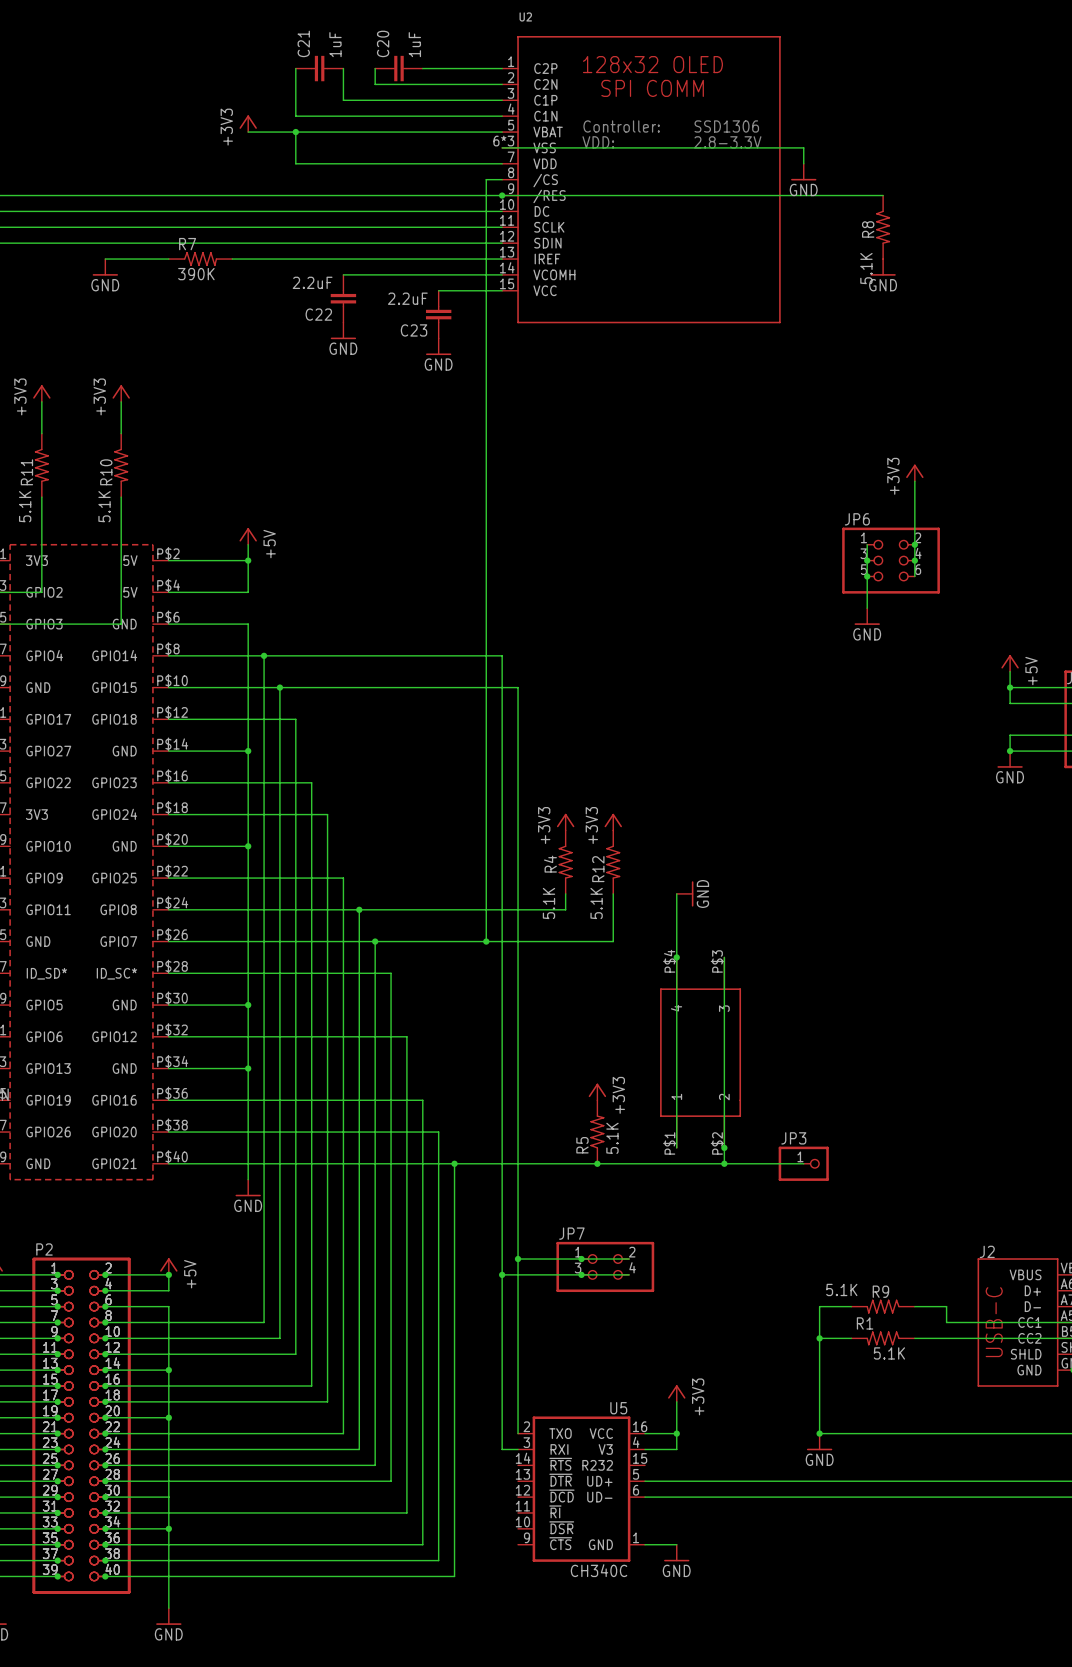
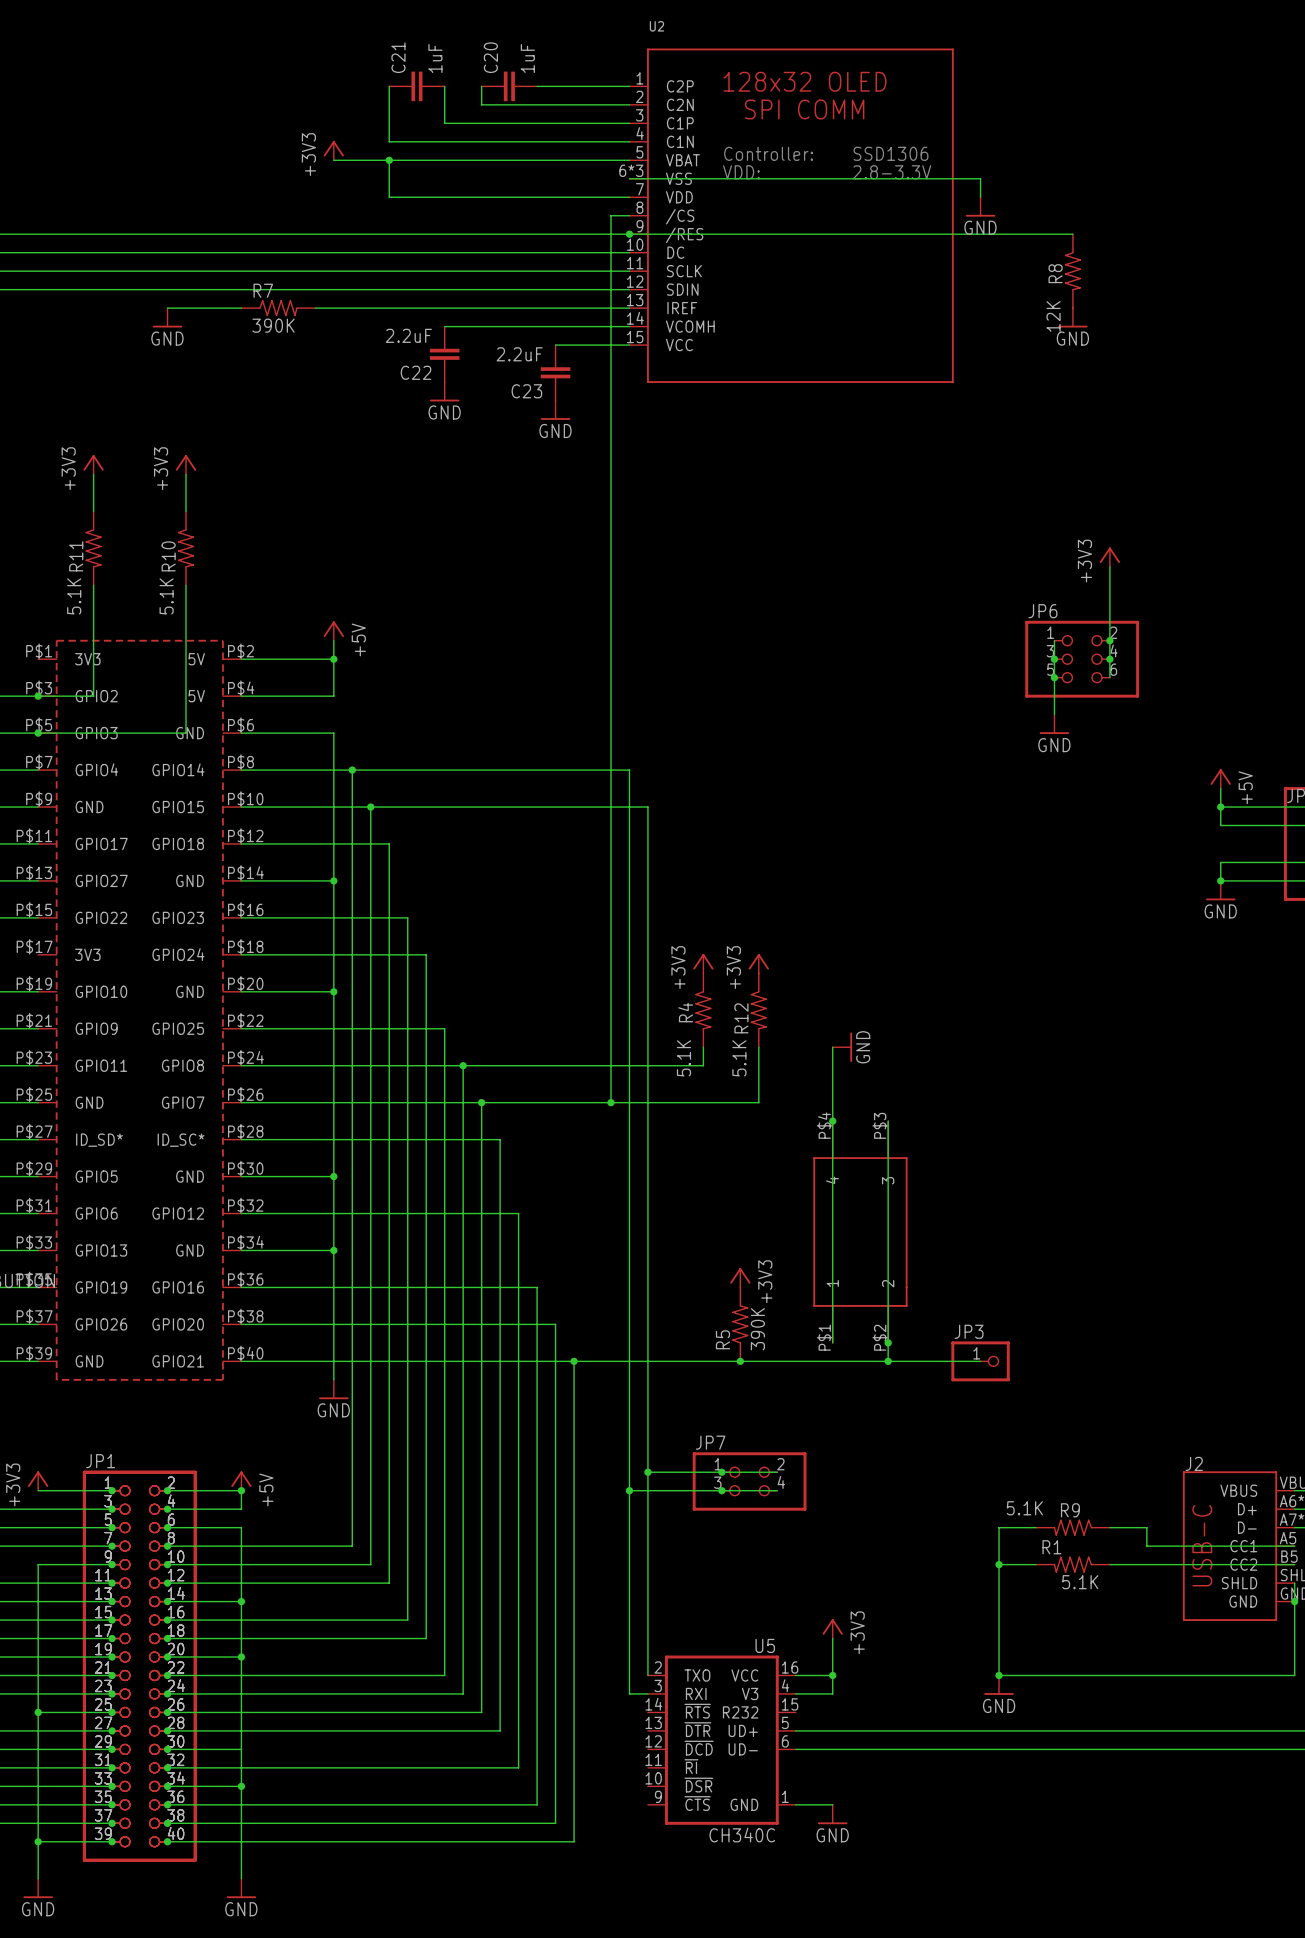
R8 value: 5.1K (866, 268) -> 12K (1053, 316)
R5 value: 5.1K (612, 1138) -> 390K (757, 1329)
P2 name: P2 (44, 1249) -> JP1 (100, 1461)

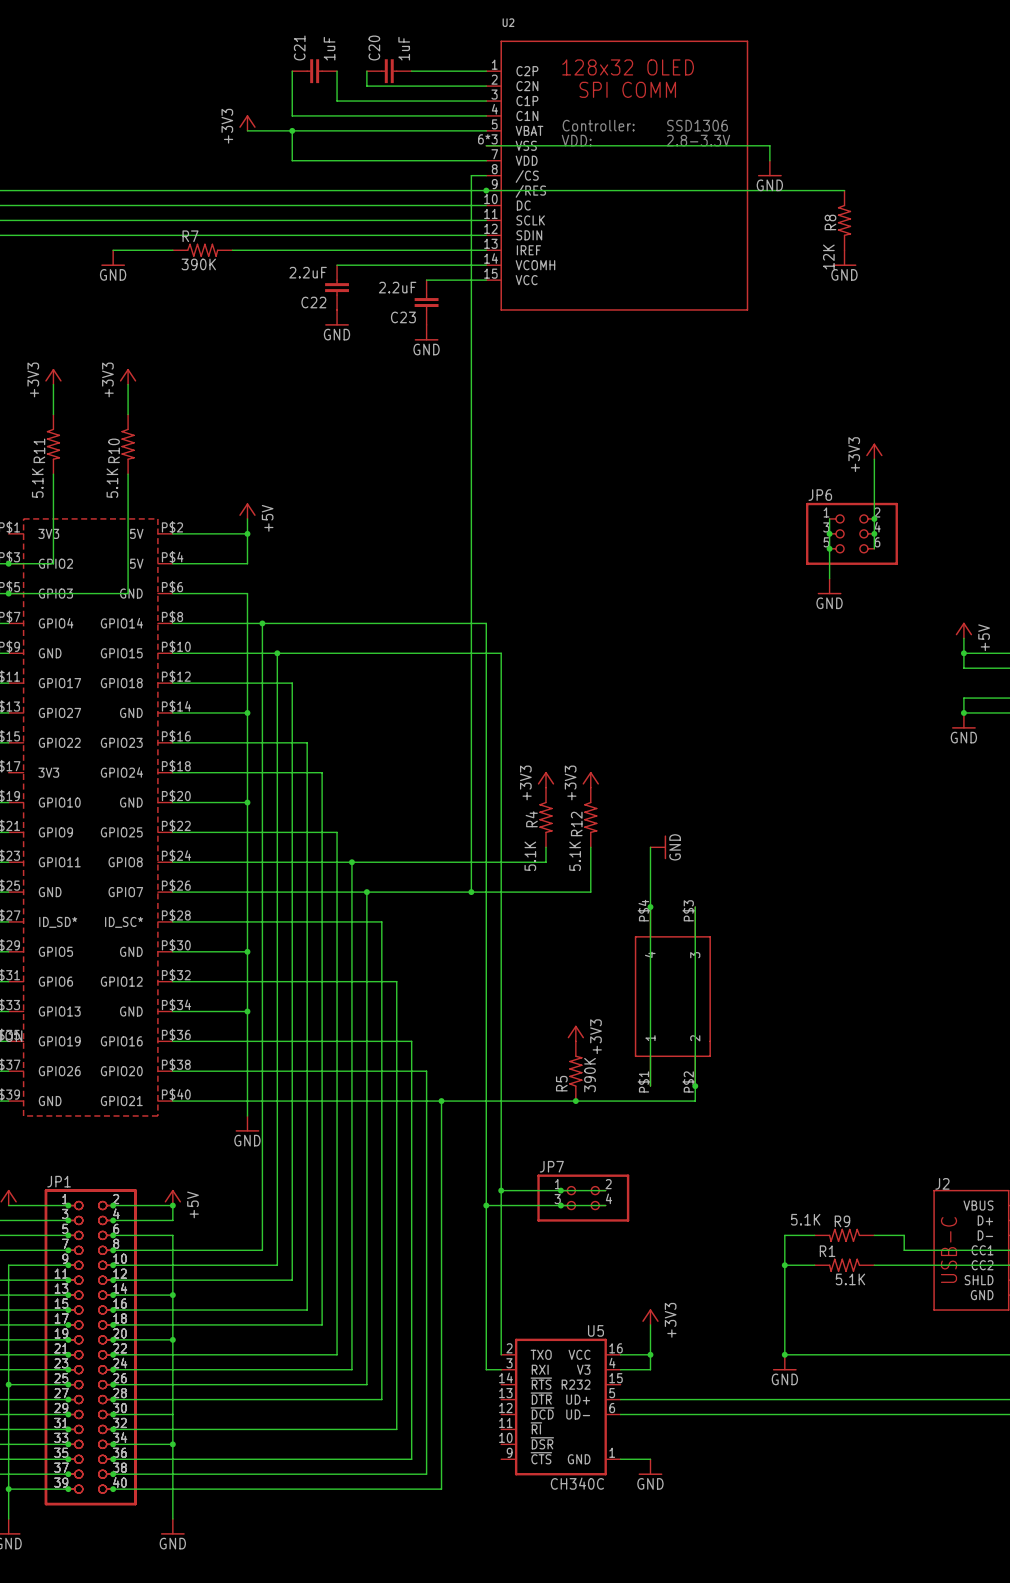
wire: (888, 1361) (980, 1361) -> none
junction: (888, 1361) -> none
JP3: (980, 1361) -> none

